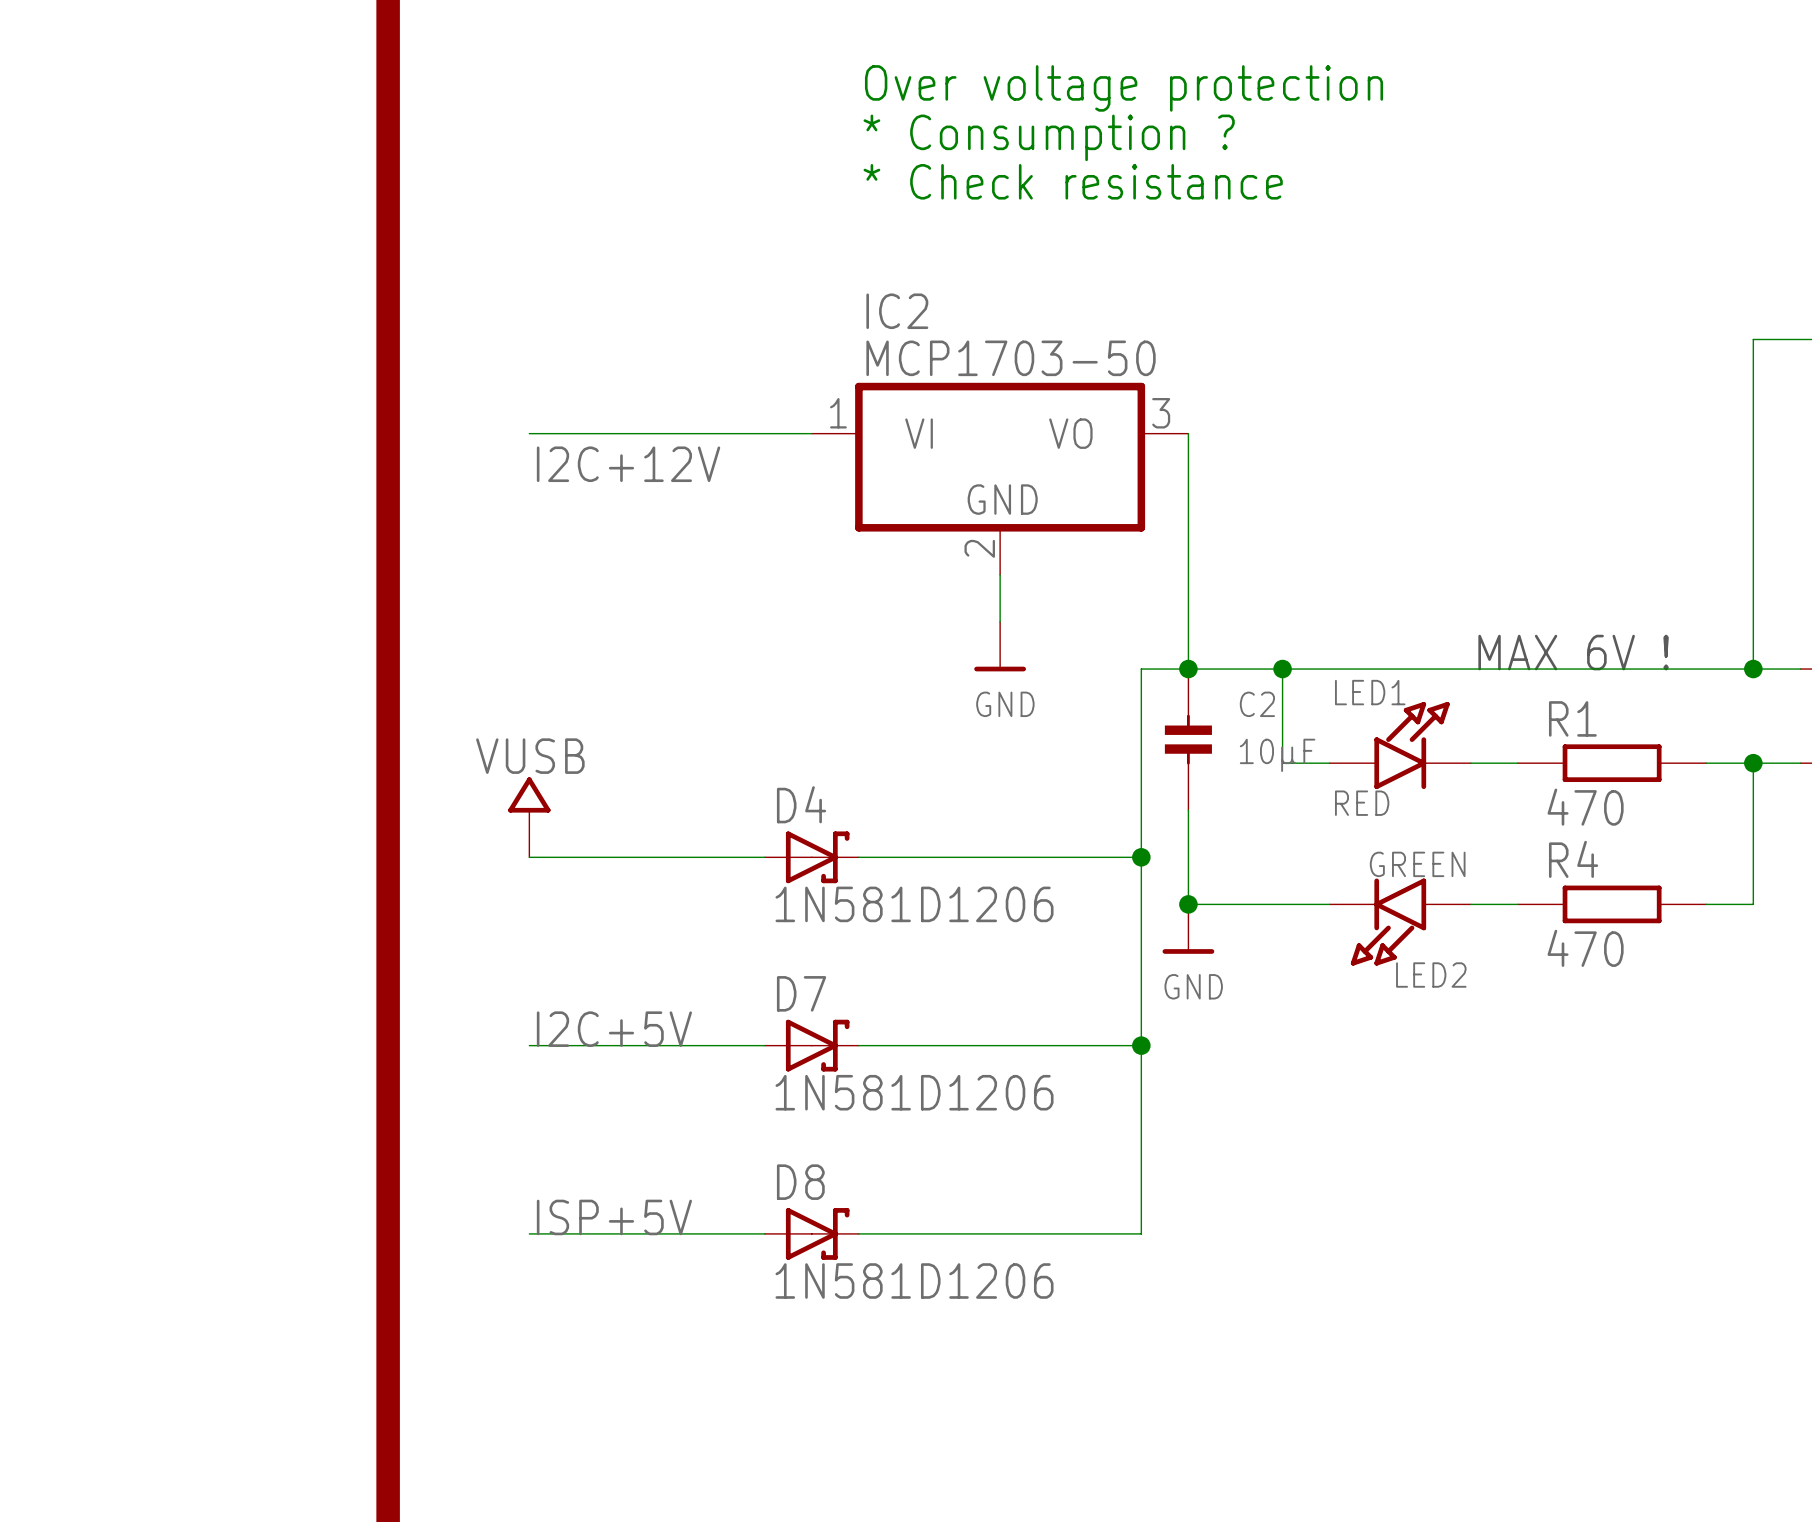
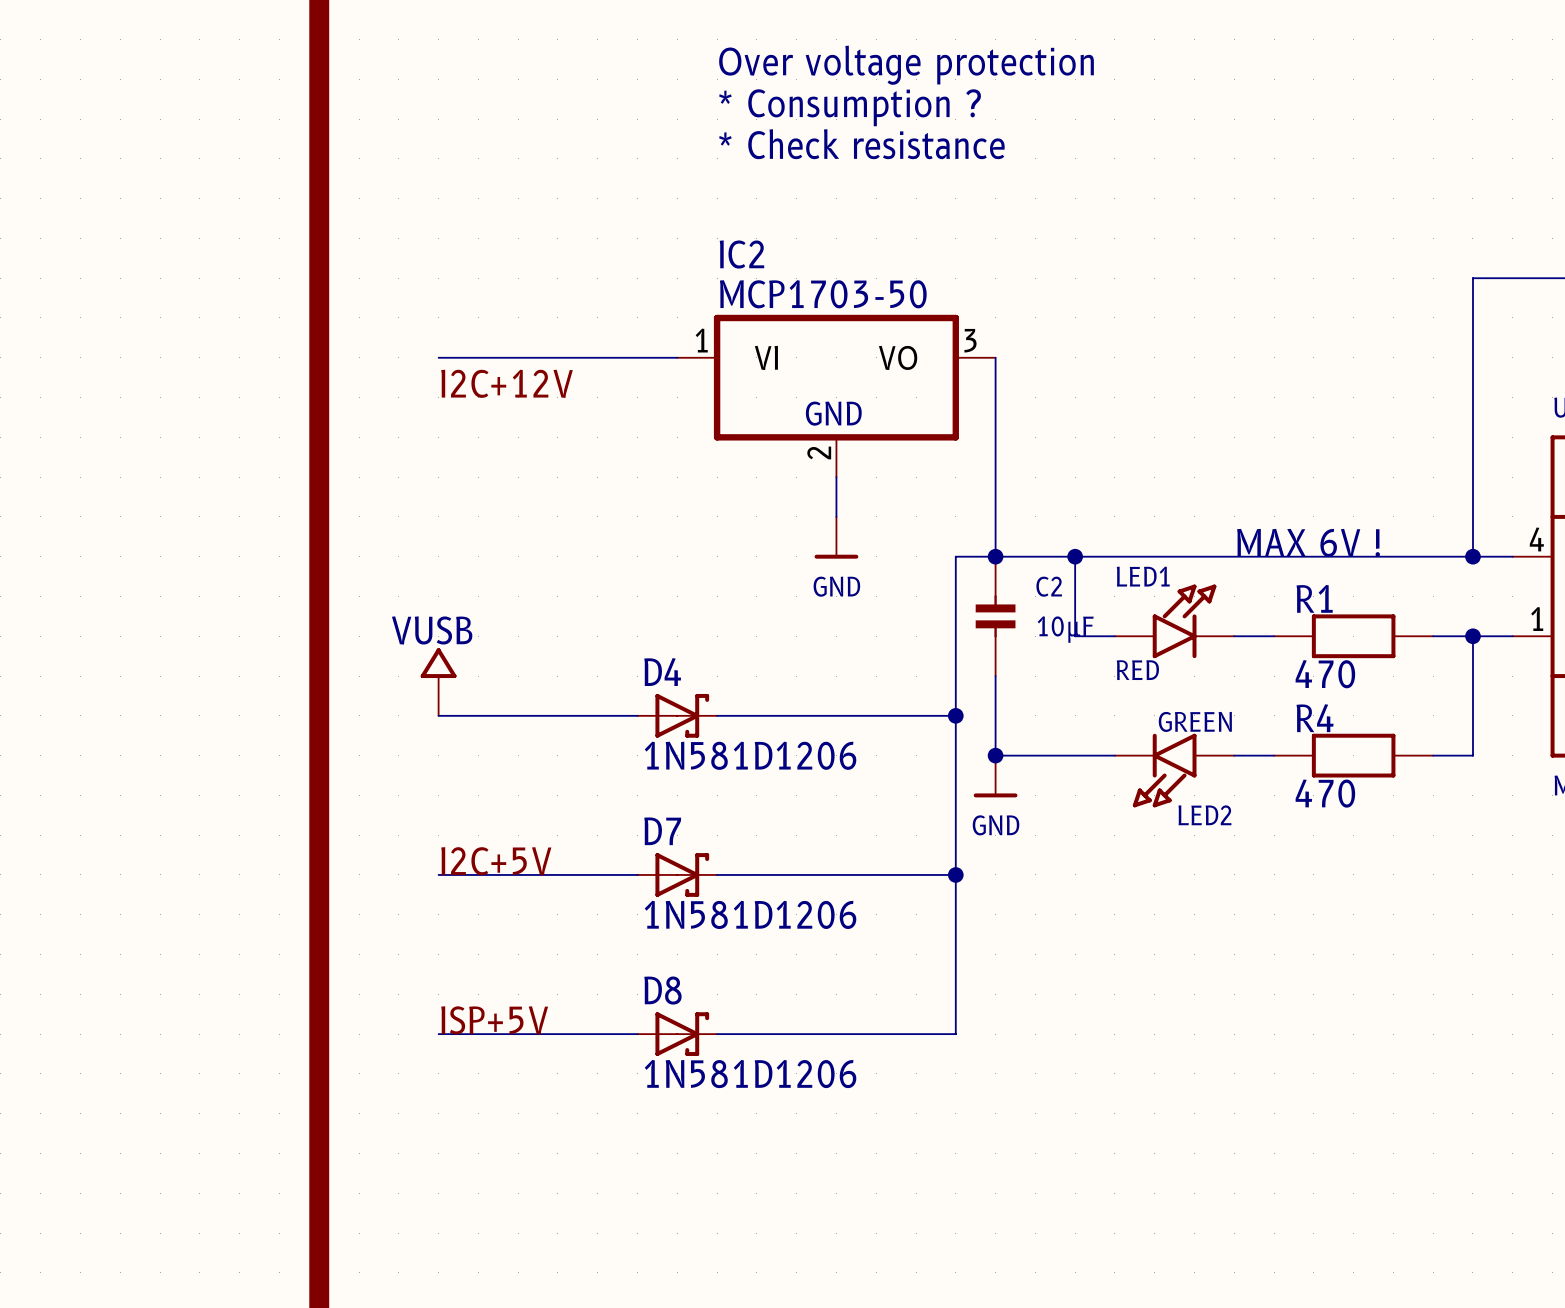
R1 symbol: [1517, 744, 1707, 783] -> [1274, 614, 1434, 659]
R4 symbol: [1517, 885, 1707, 924] -> [1274, 733, 1434, 778]

